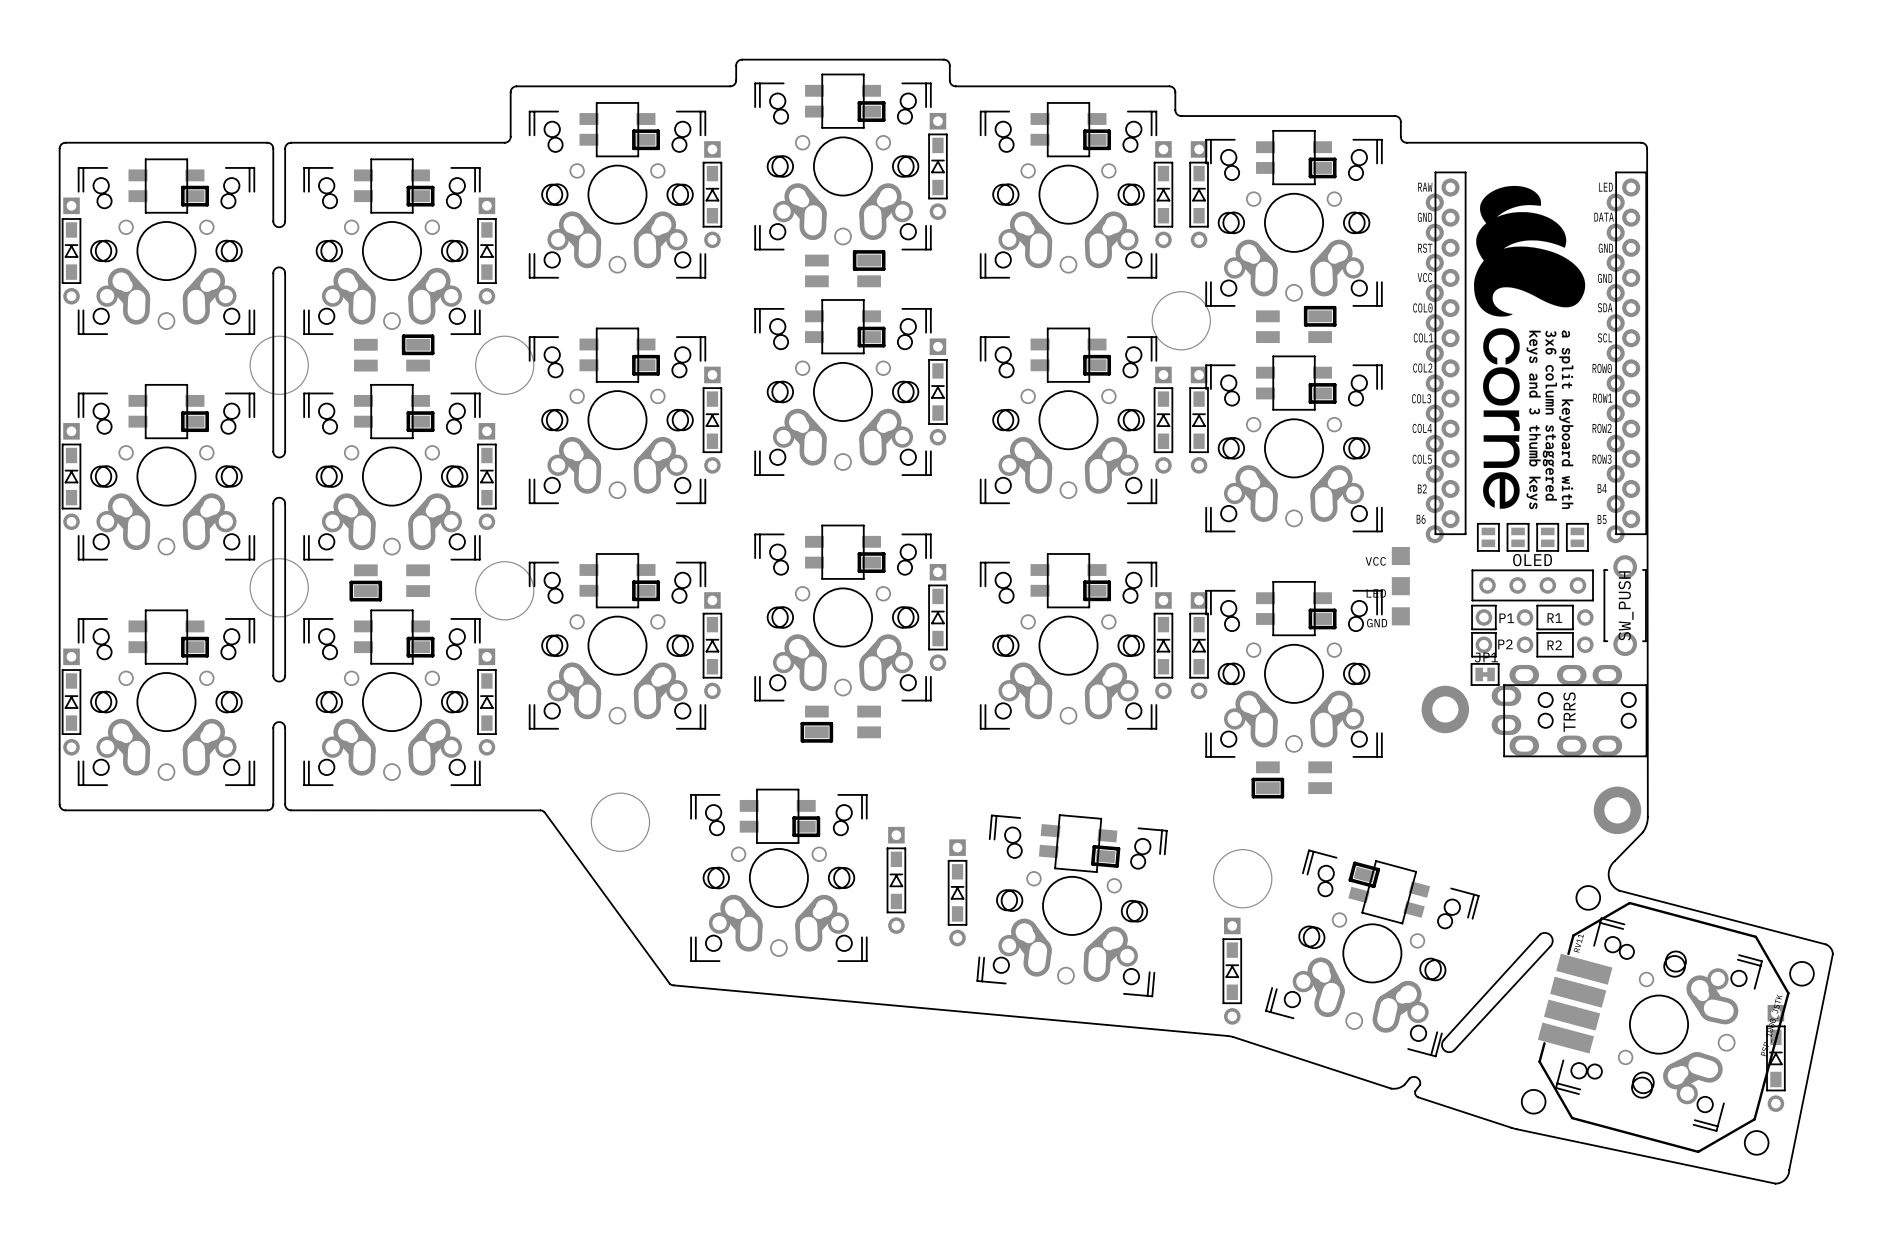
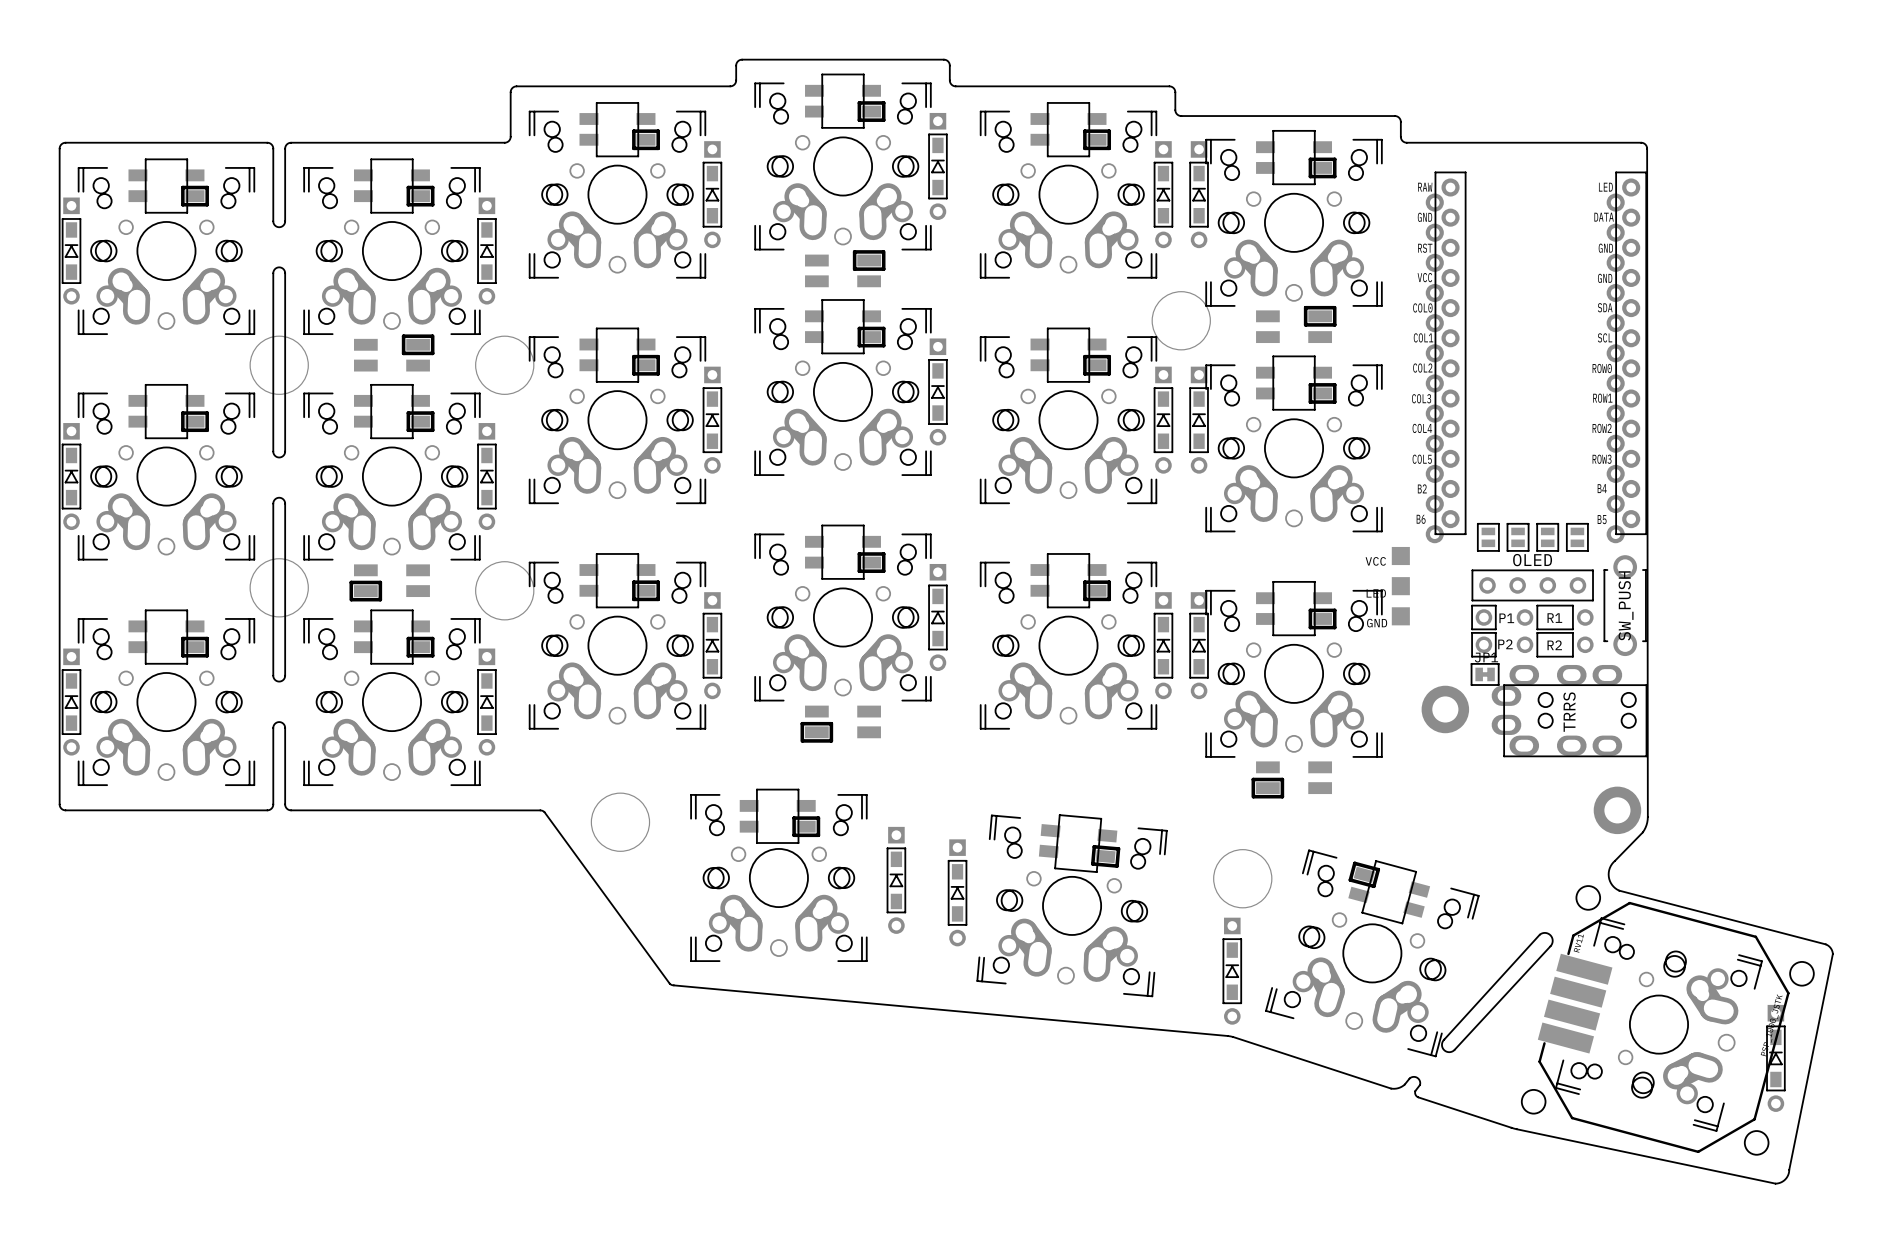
drawing: [1474, 185, 1586, 510] -> none

